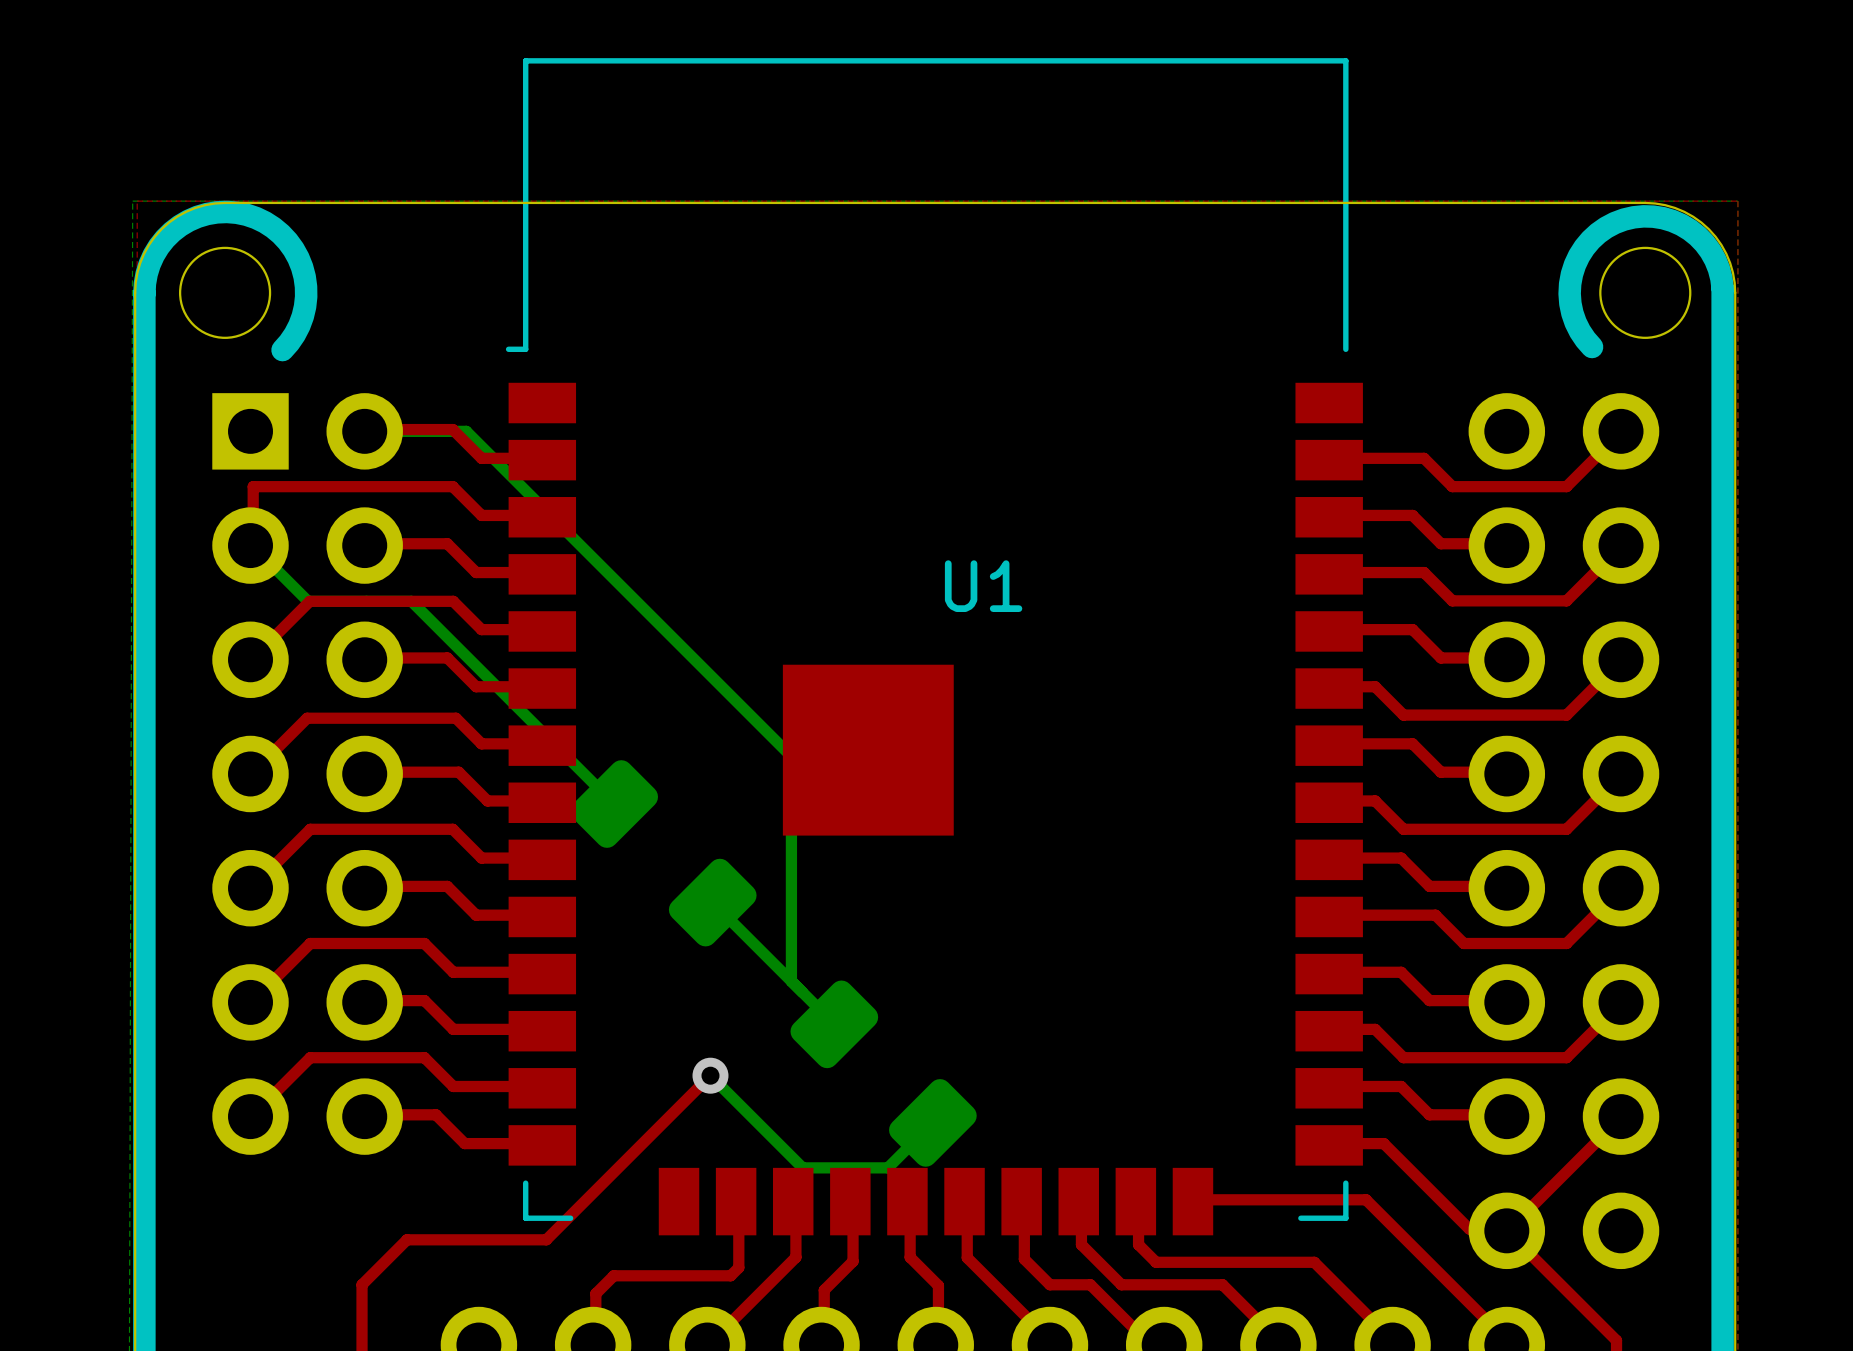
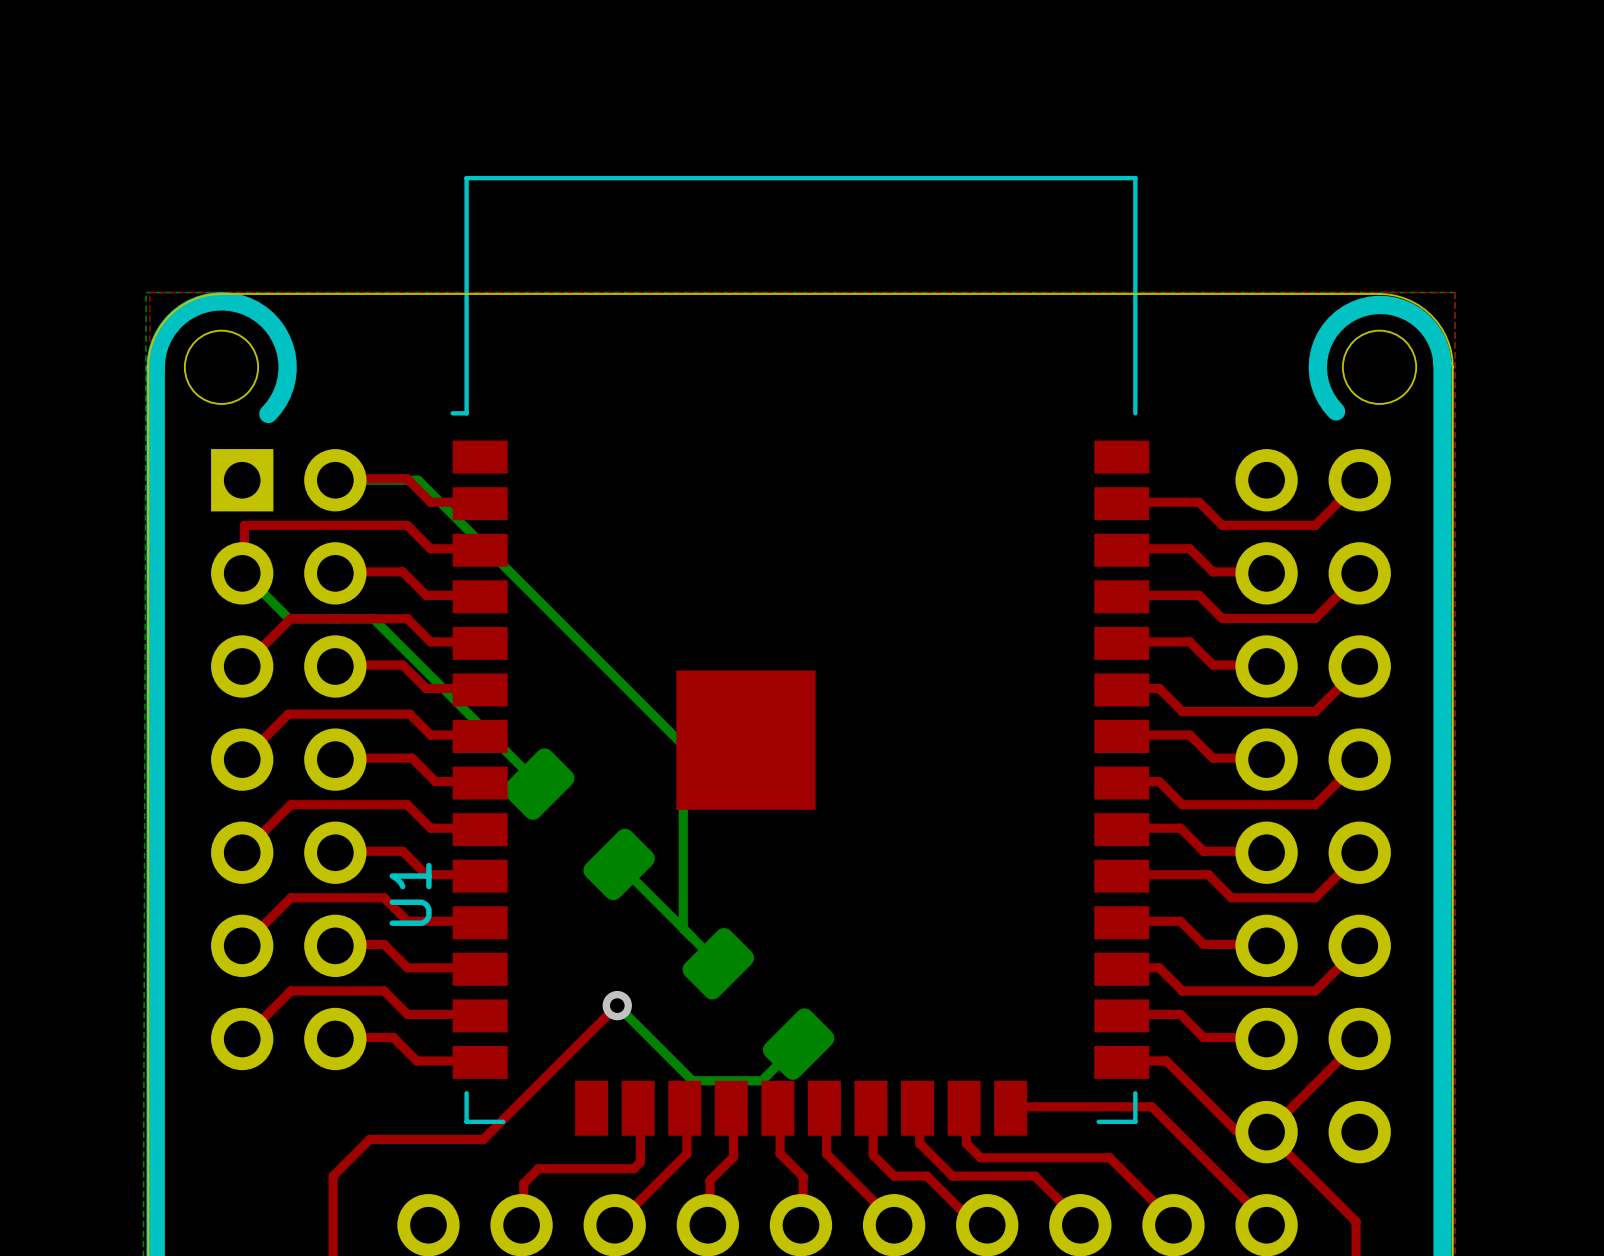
U1 name rotation: 0° (983, 586) -> 90° counterclockwise (410, 894)
U1 name position: U1 (983, 586) -> U1 (410, 894)

